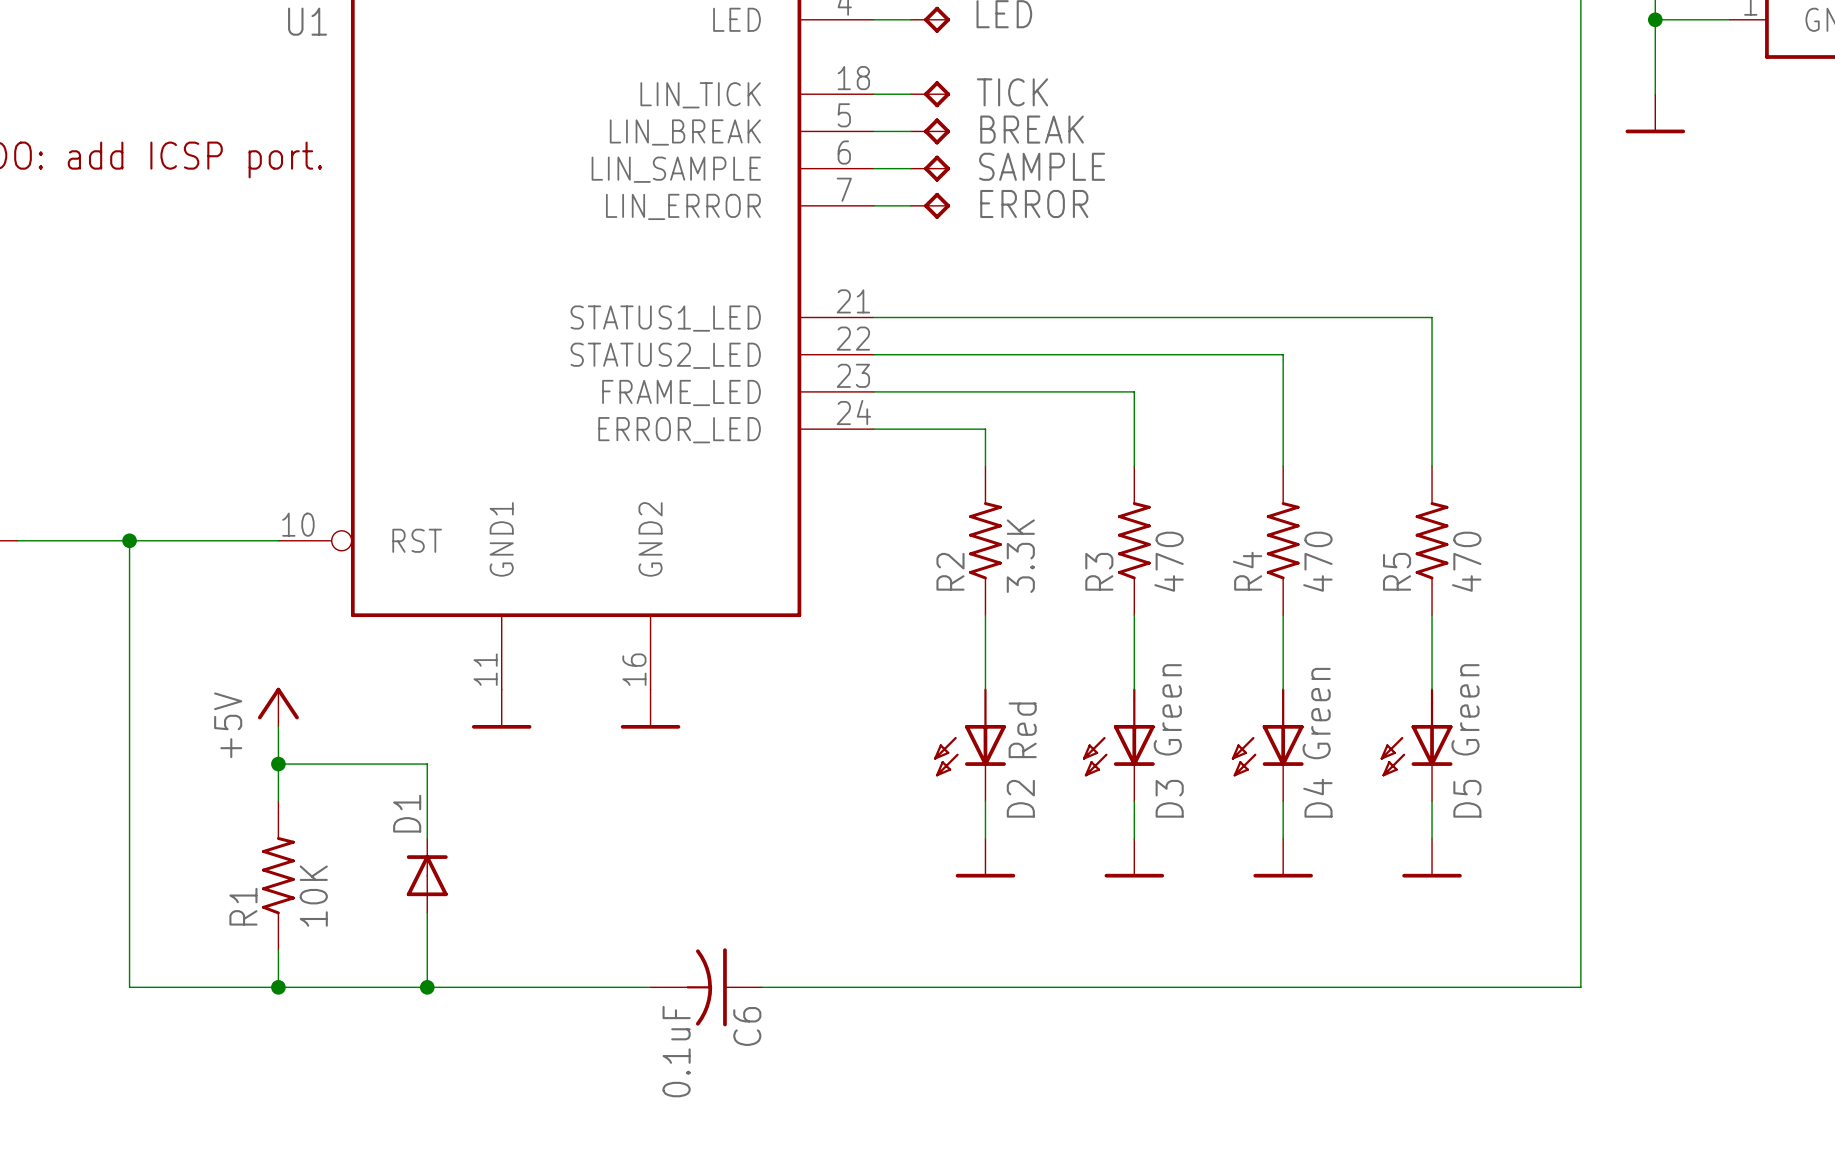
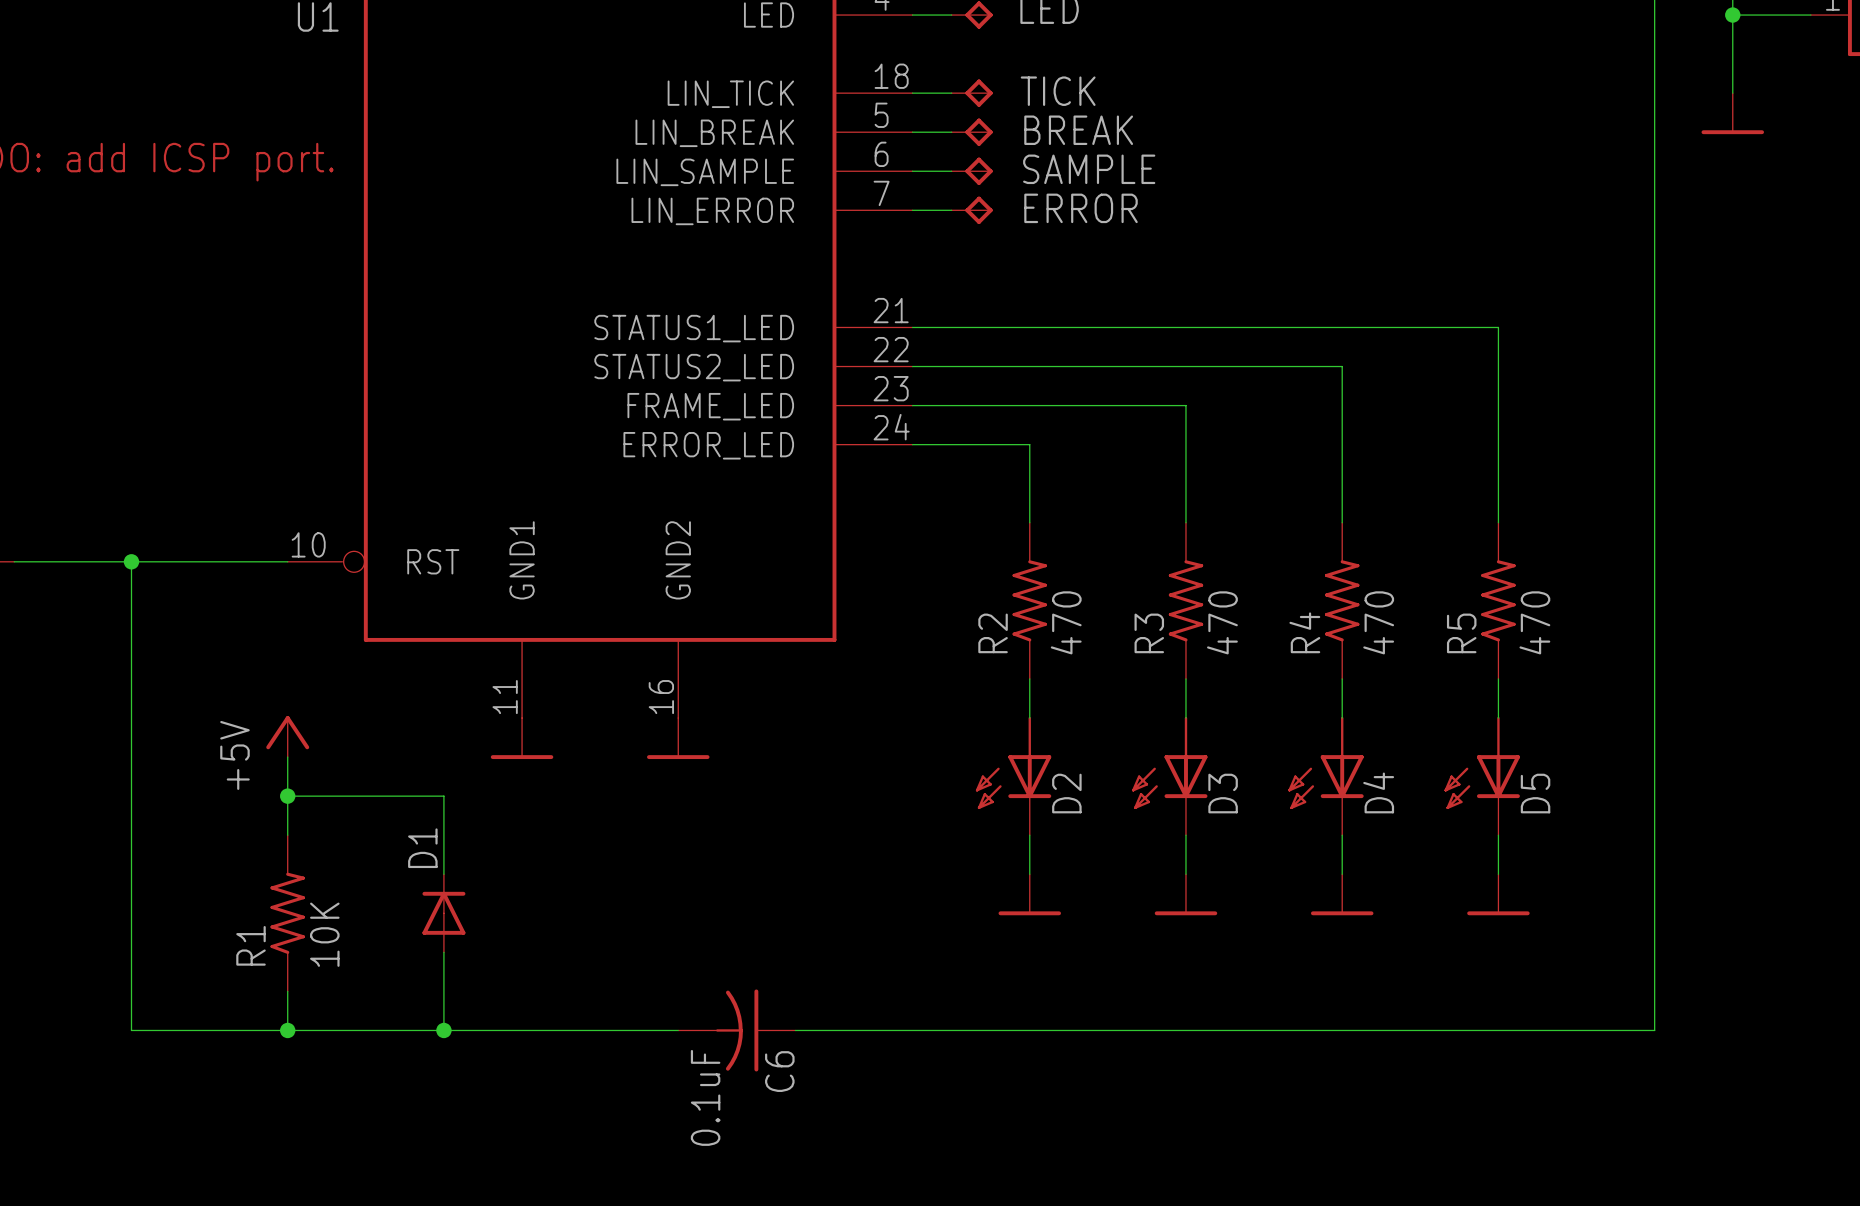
R2 position: (985, 540) -> (1029, 600)
R3 position: (1134, 540) -> (1185, 600)
R4 position: (1283, 540) -> (1342, 600)
R5 position: (1432, 540) -> (1498, 600)
R2 value: 3.3K (1020, 556) -> 470 (1066, 622)
D3 value: Green (1167, 709) -> none
D5 value: Green (1465, 709) -> none
D4 value: Green (1316, 713) -> none
D2 value: Red (1022, 730) -> none
D2 name position: D2 (1020, 798) -> D2 (1066, 793)
D3 name position: D3 (1169, 798) -> D3 (1223, 793)
D4 name position: D4 (1317, 798) -> D4 (1378, 792)
D5 name position: D5 (1467, 798) -> D5 (1535, 793)

